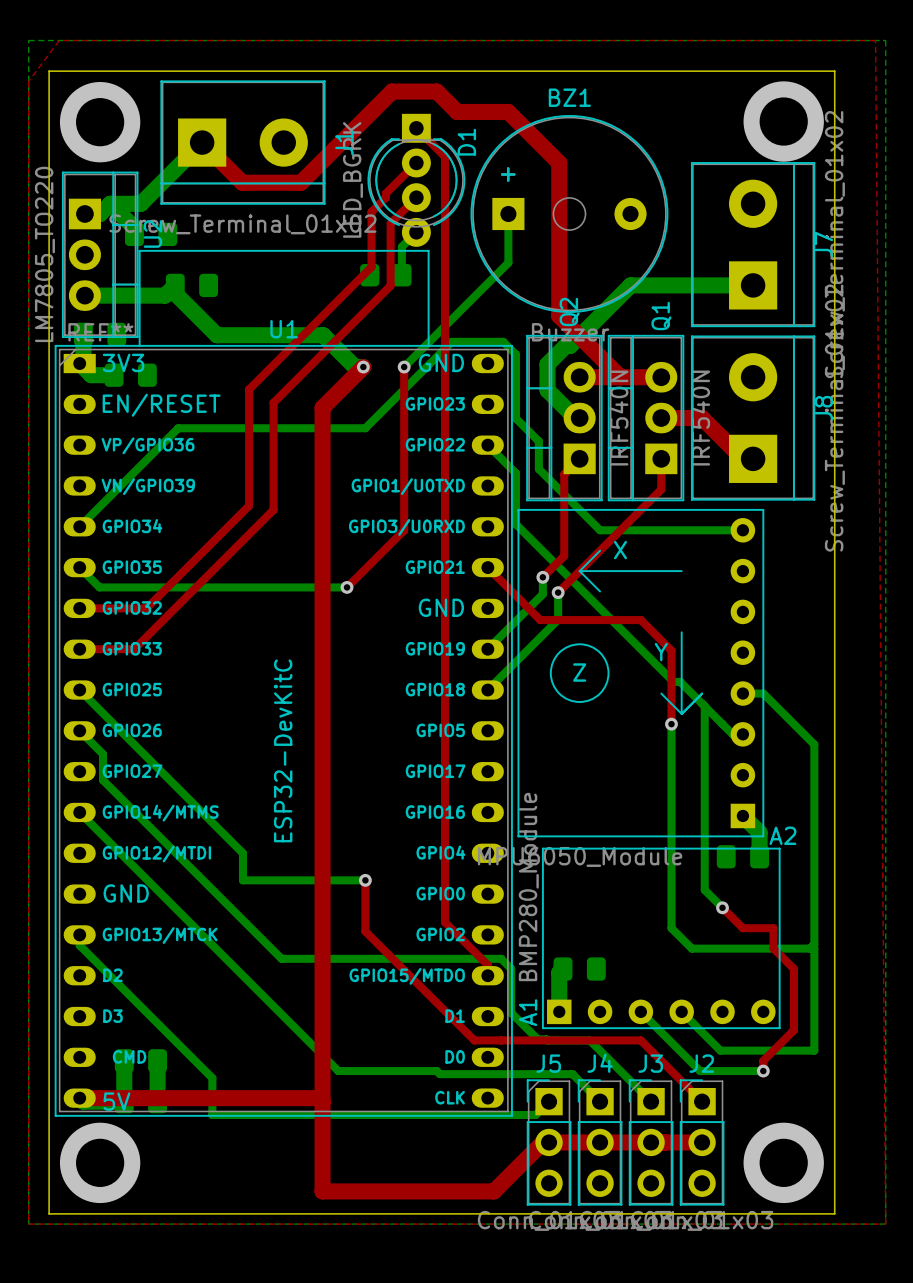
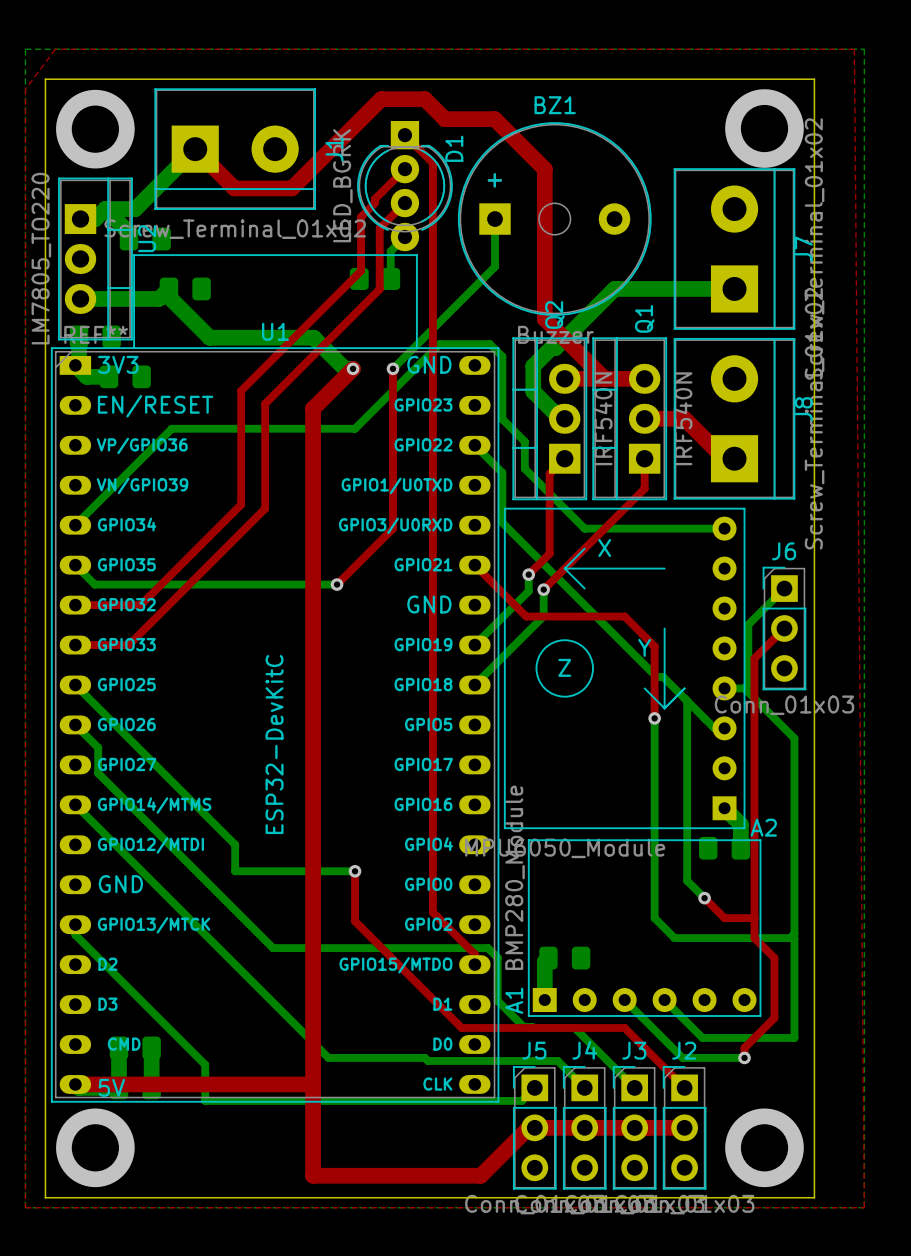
bottom track: none -> (784, 588) (748, 624) (748, 684) (744, 688)
top track: none -> (784, 628) (754, 658) (754, 918)
J6: none -> Conn_01x03 (784, 628)

